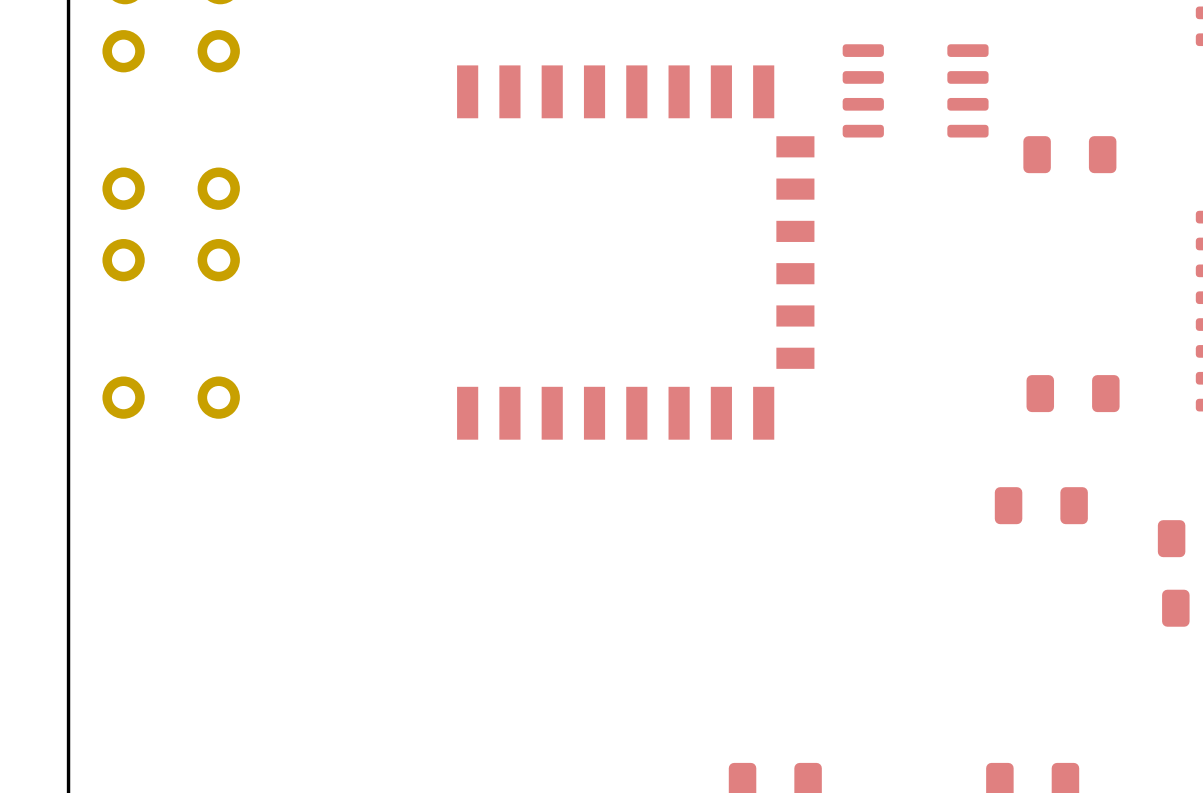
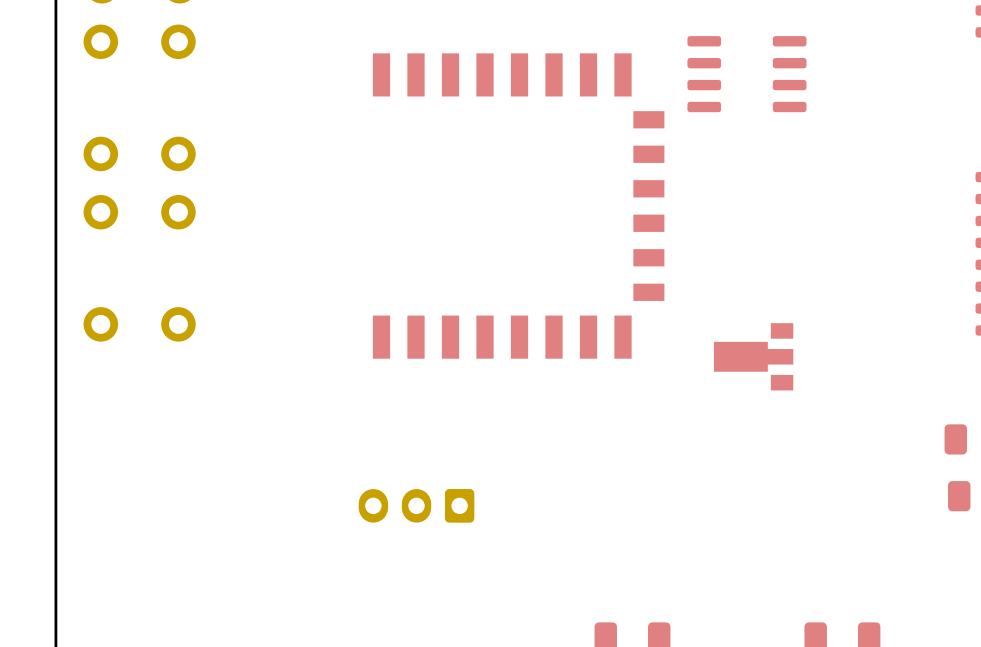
part: (1069, 154) -> none
part: (1073, 393) -> none
part: none -> (753, 356)
part: (1041, 505) -> none
part: none -> (416, 505)

